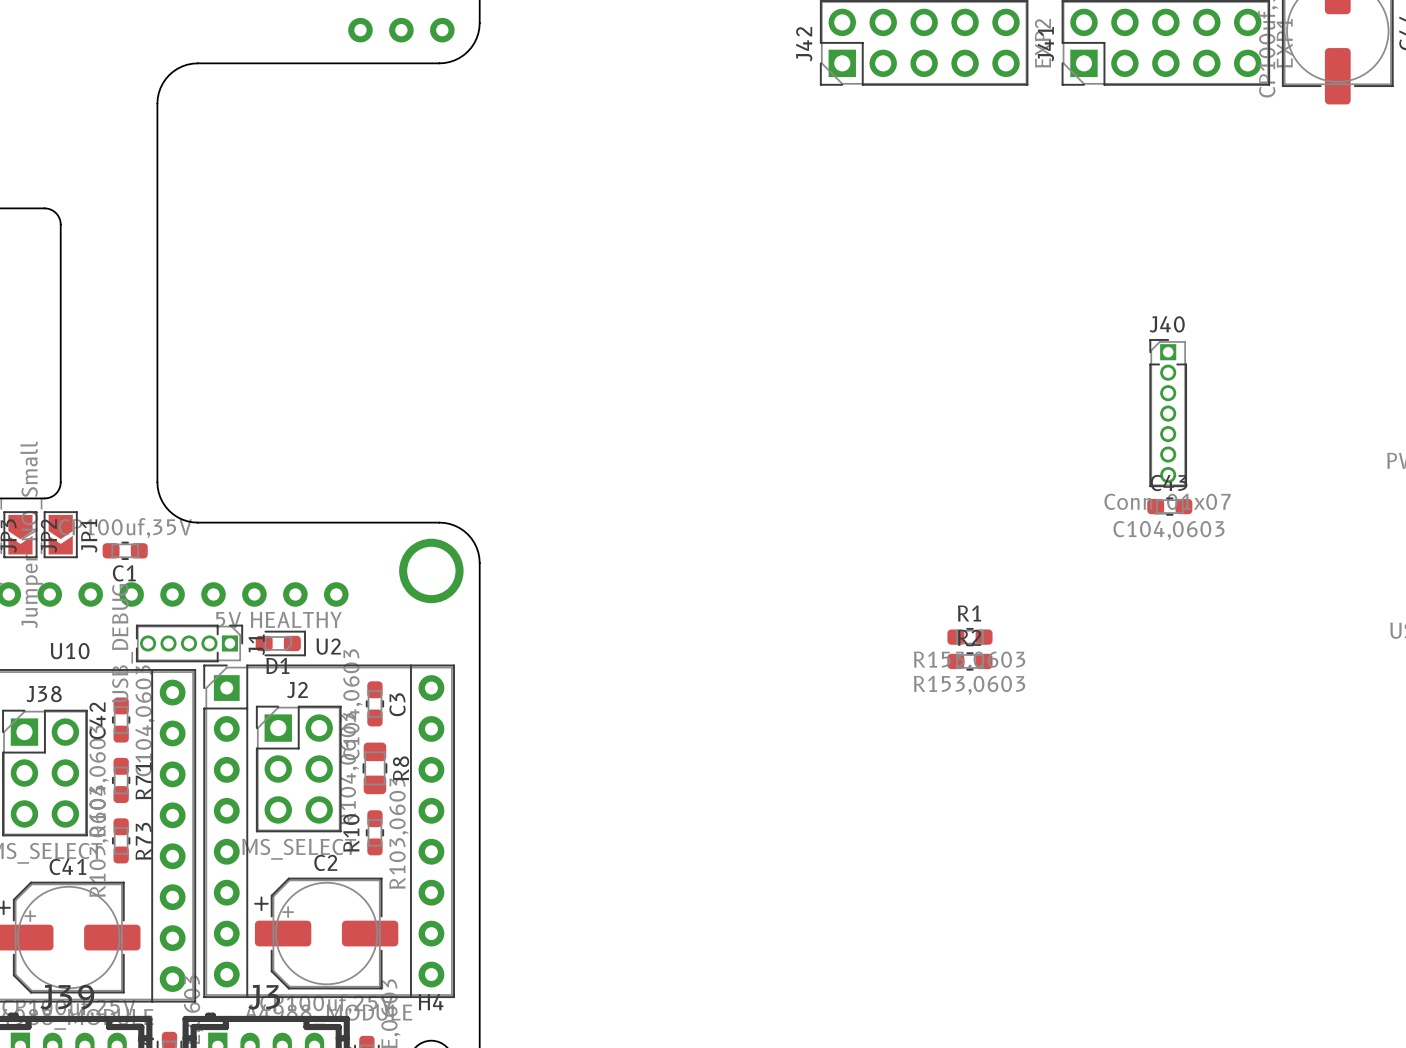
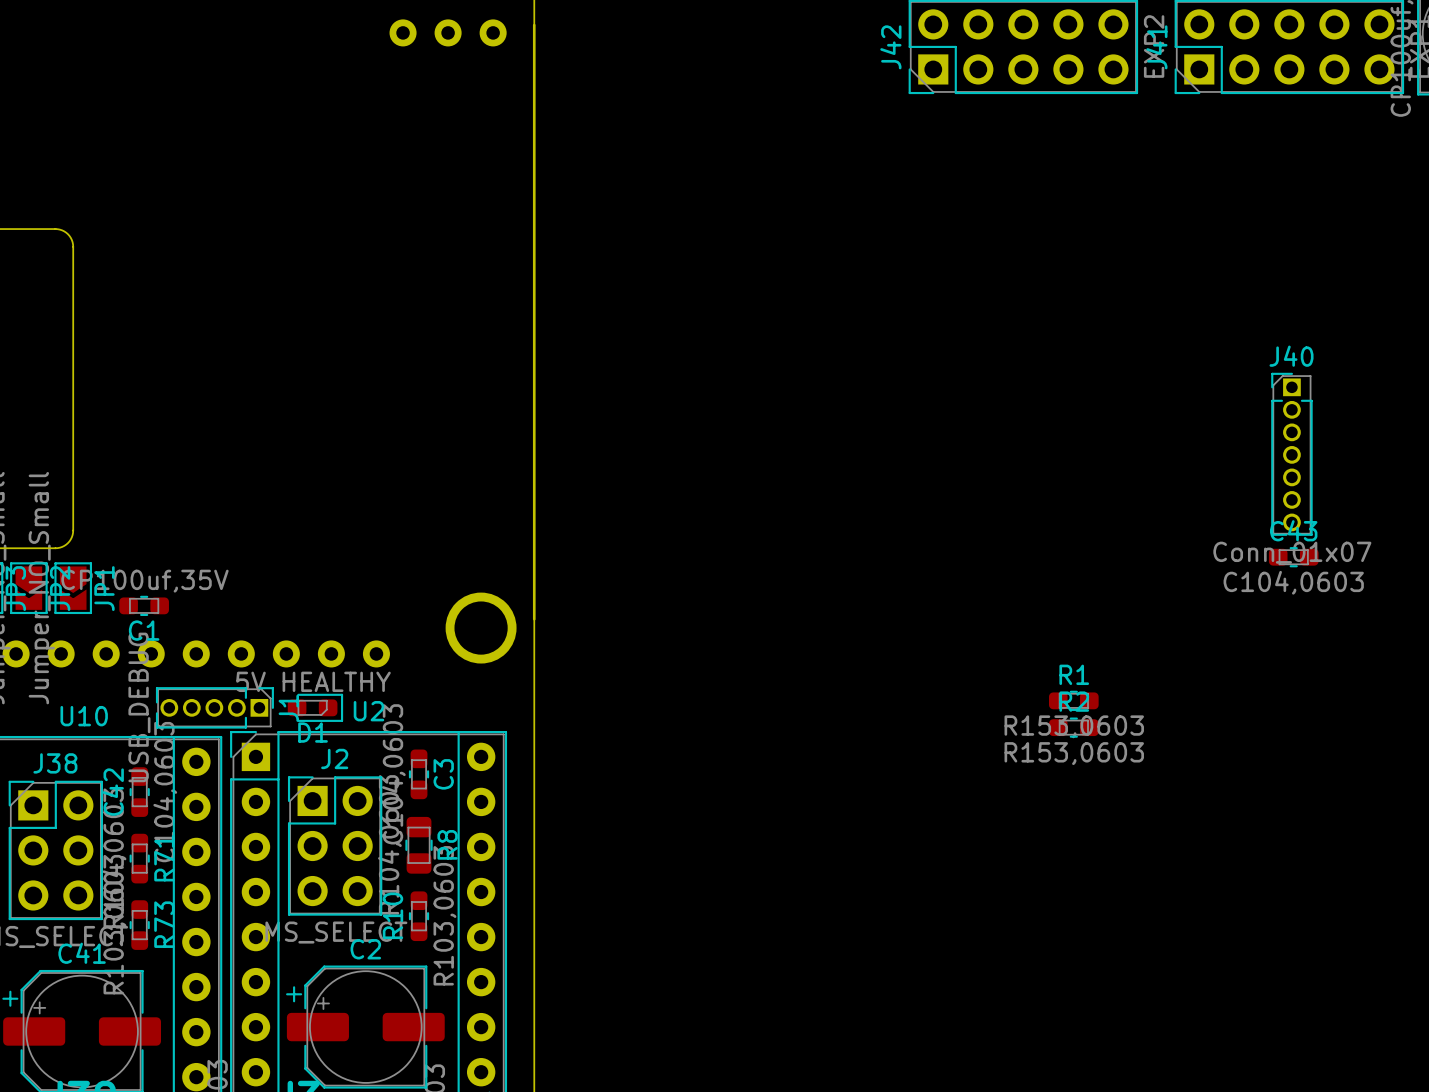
board edge: (479, 23) (478, 33) (471, 47) (463, 55) (449, 61) (192, 63) (177, 68) (165, 79) (158, 93) (157, 103) (157, 482) (158, 492) (165, 506) (177, 517) (197, 522) (444, 522) (459, 528) (471, 538) (478, 552) (479, 562) -> (534, 25) (534, 619)

